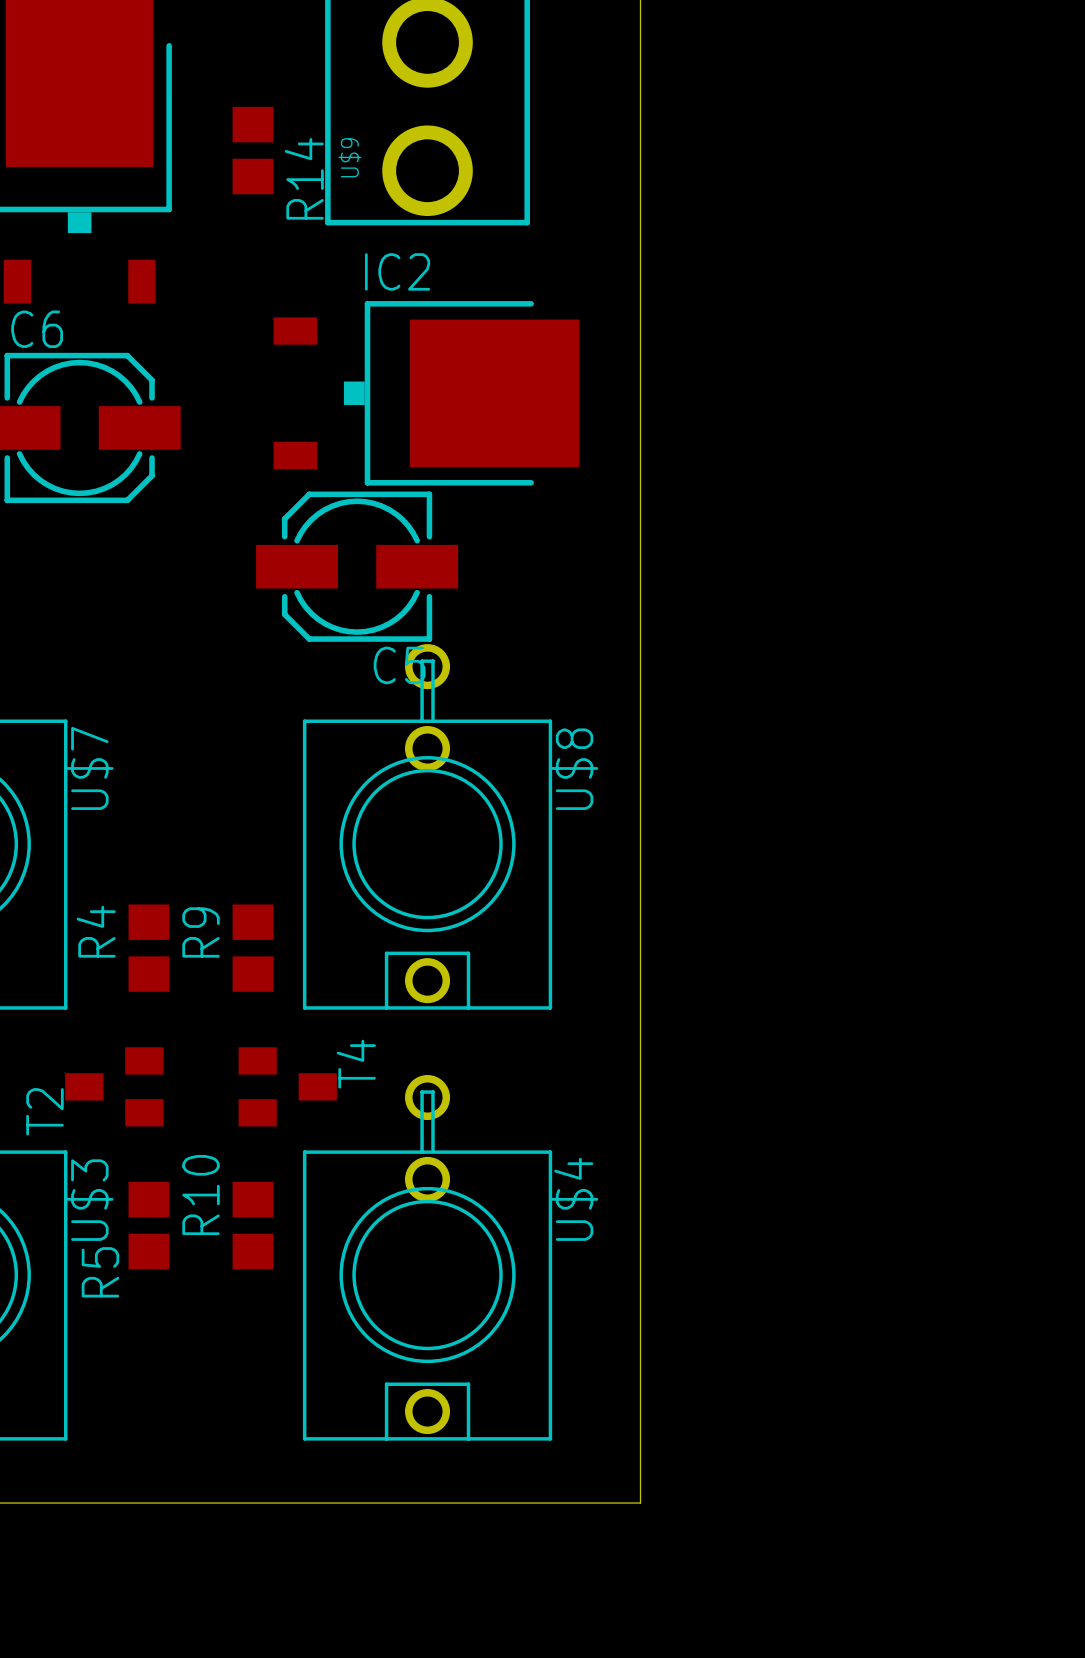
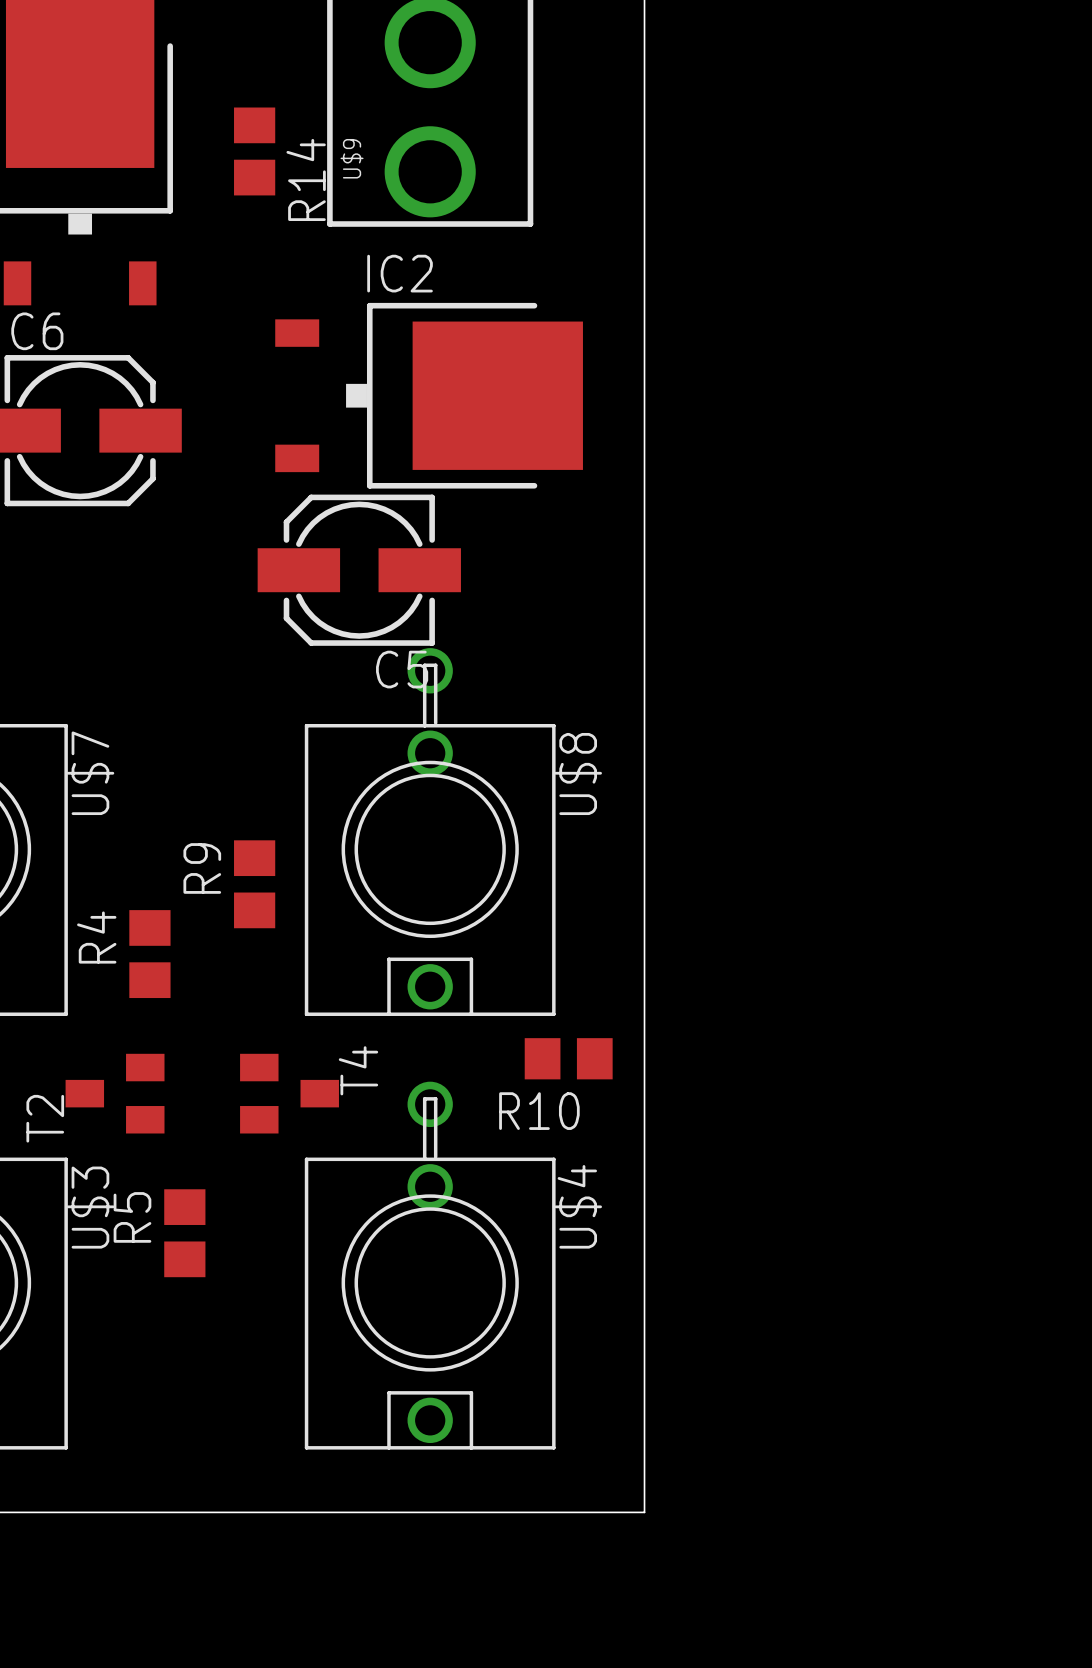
R9 position: (253, 948) -> (254, 884)
R10 name position: R10 (201, 1195) -> R10 (539, 1111)
R5 position: (149, 1225) -> (184, 1233)
R10 rotation: 0° (253, 1225) -> 90° clockwise (568, 1058)
R10 position: (253, 1225) -> (568, 1058)
R5 name position: R5 (100, 1272) -> R5 (132, 1217)

